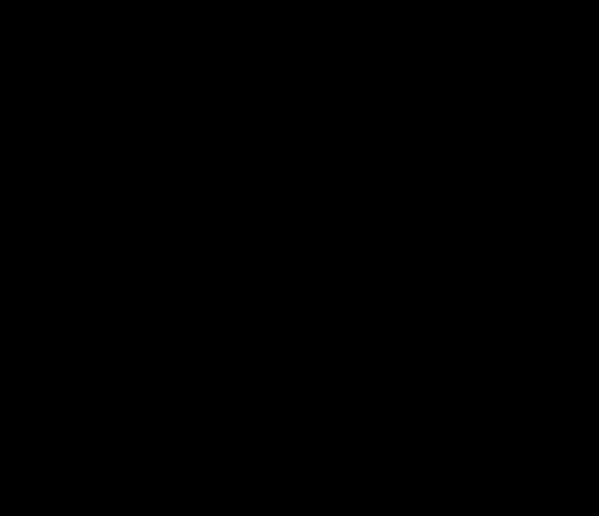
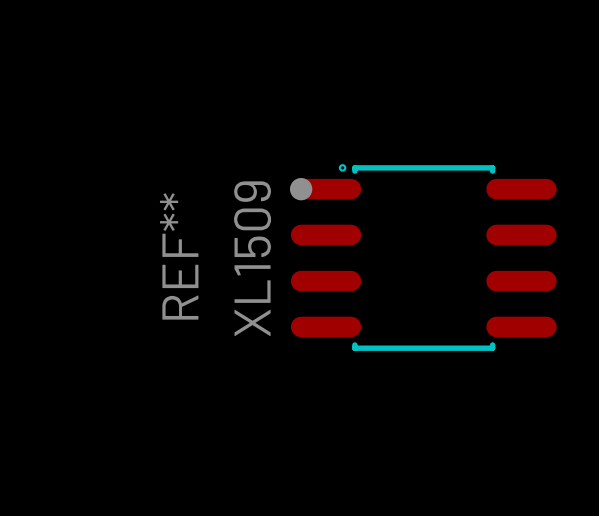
part: none -> XL1509 (423, 257)

